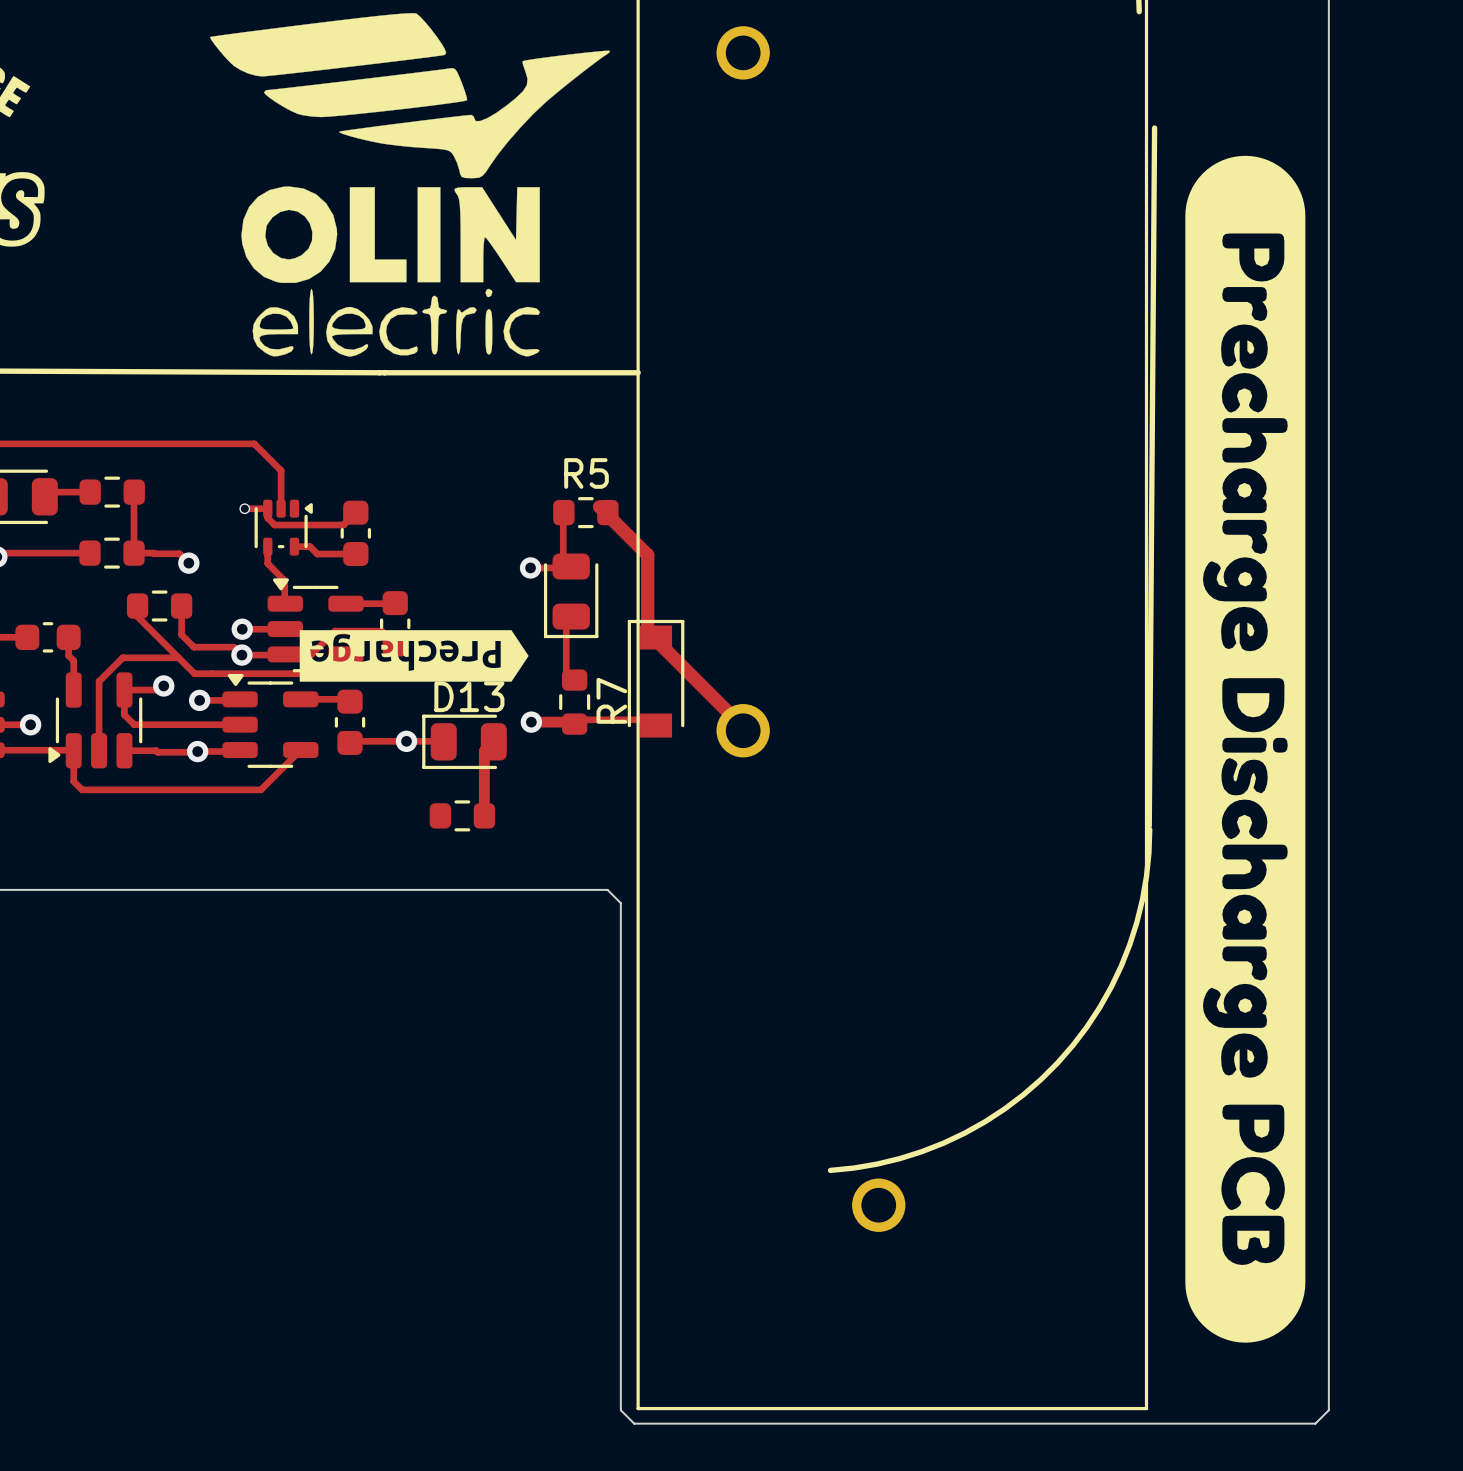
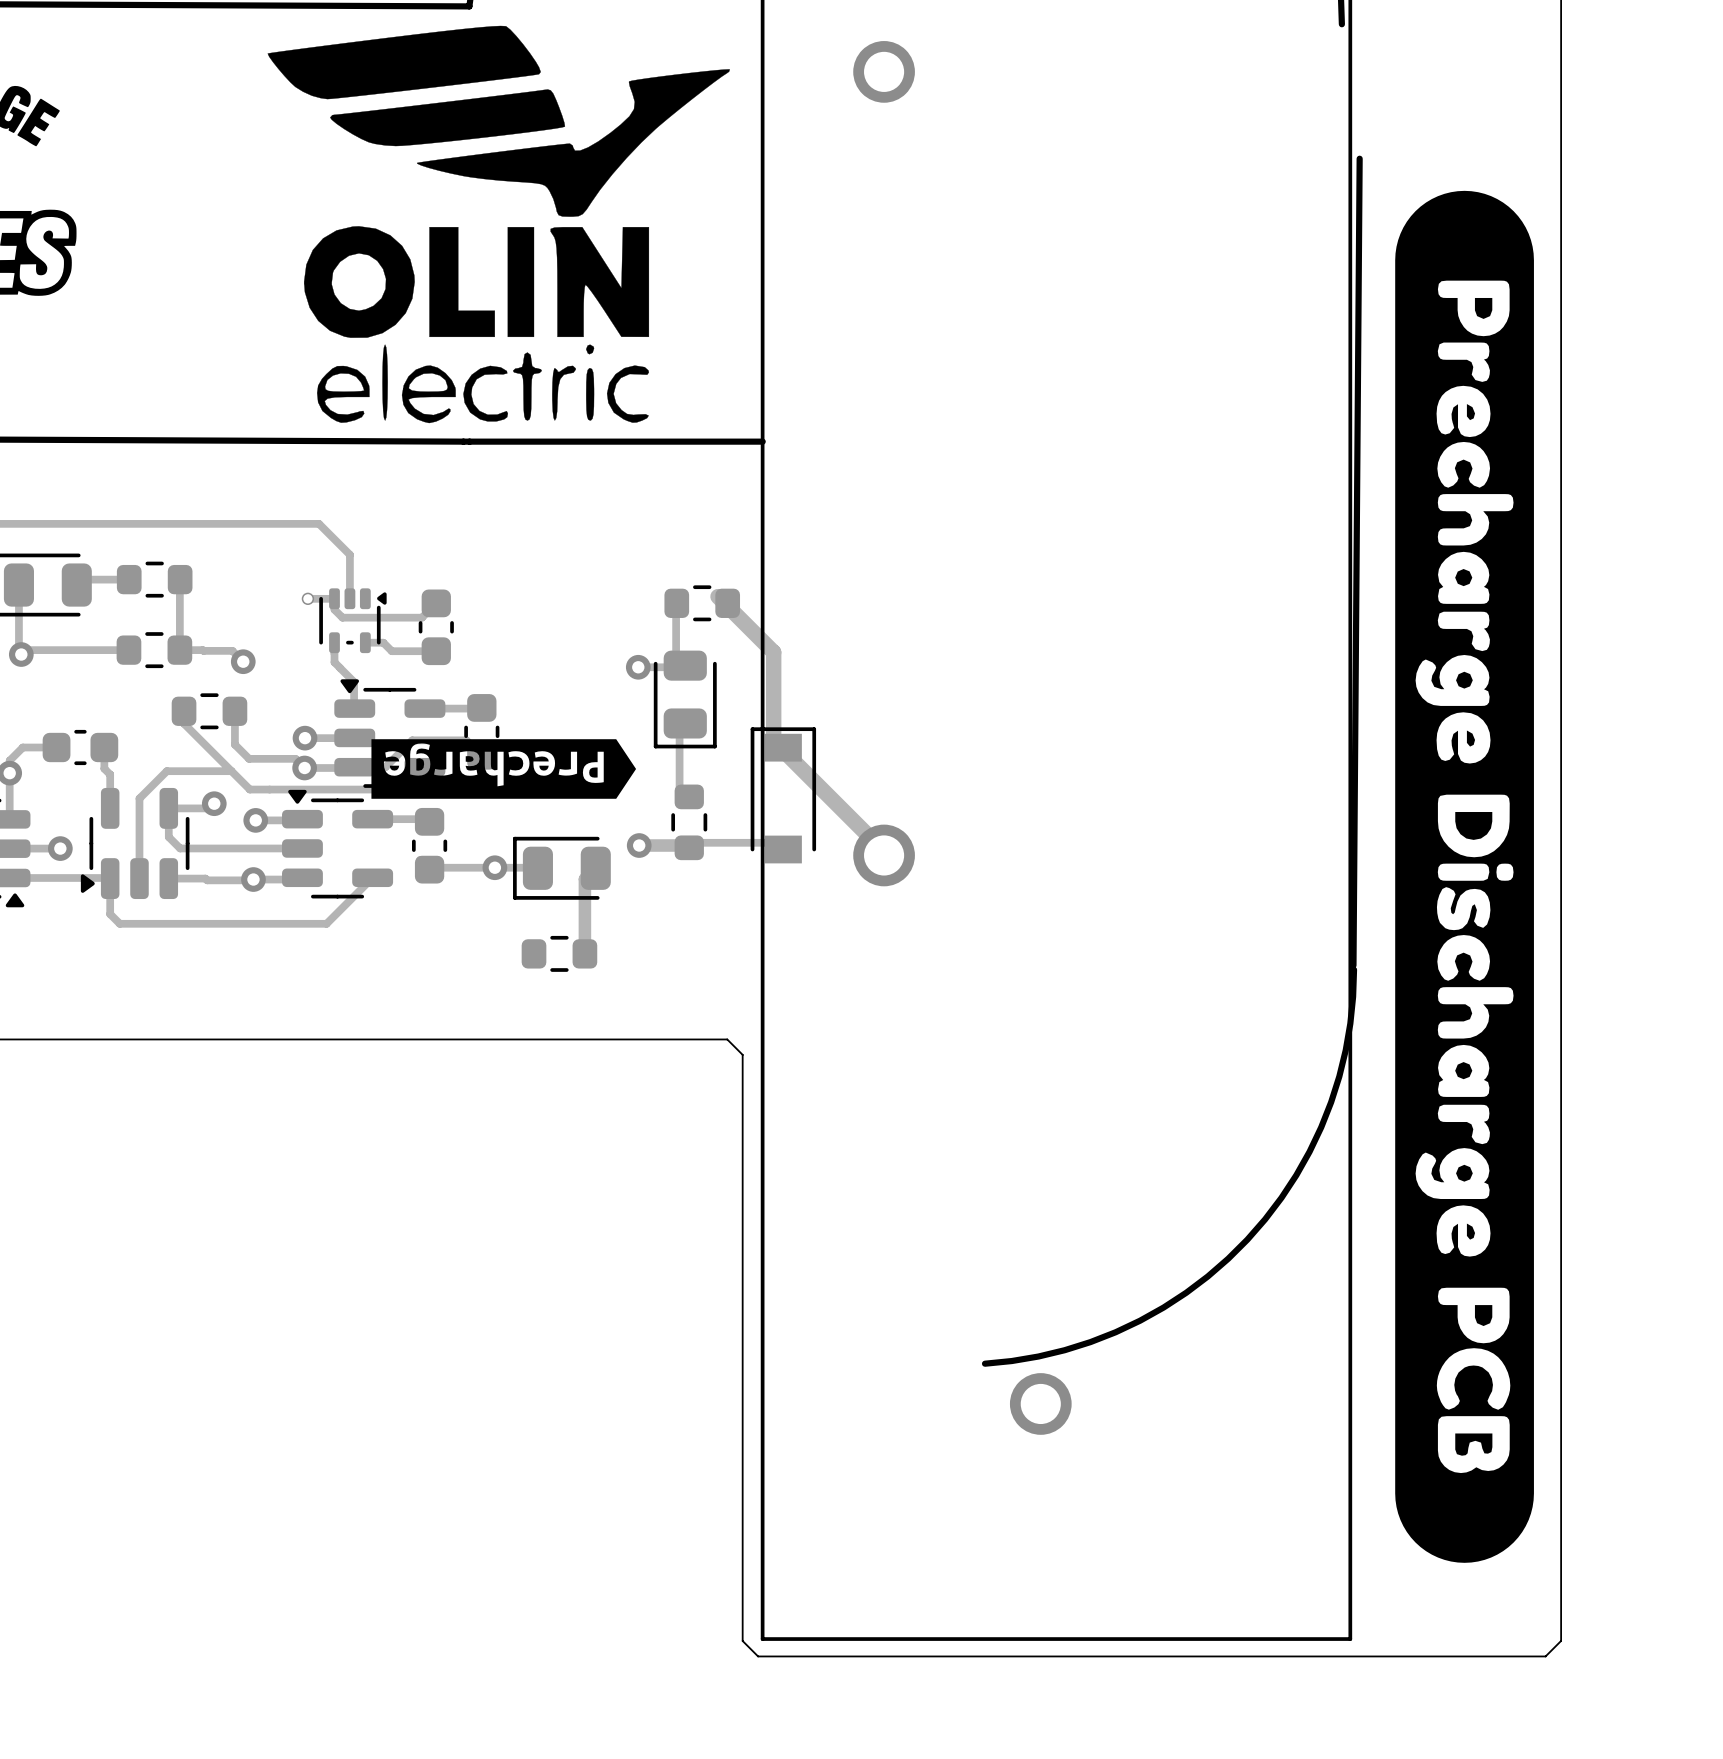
R5 name: R5 (586, 473) -> none
D13 name: D13 (469, 696) -> none
R7 name: R7 (611, 700) -> none

